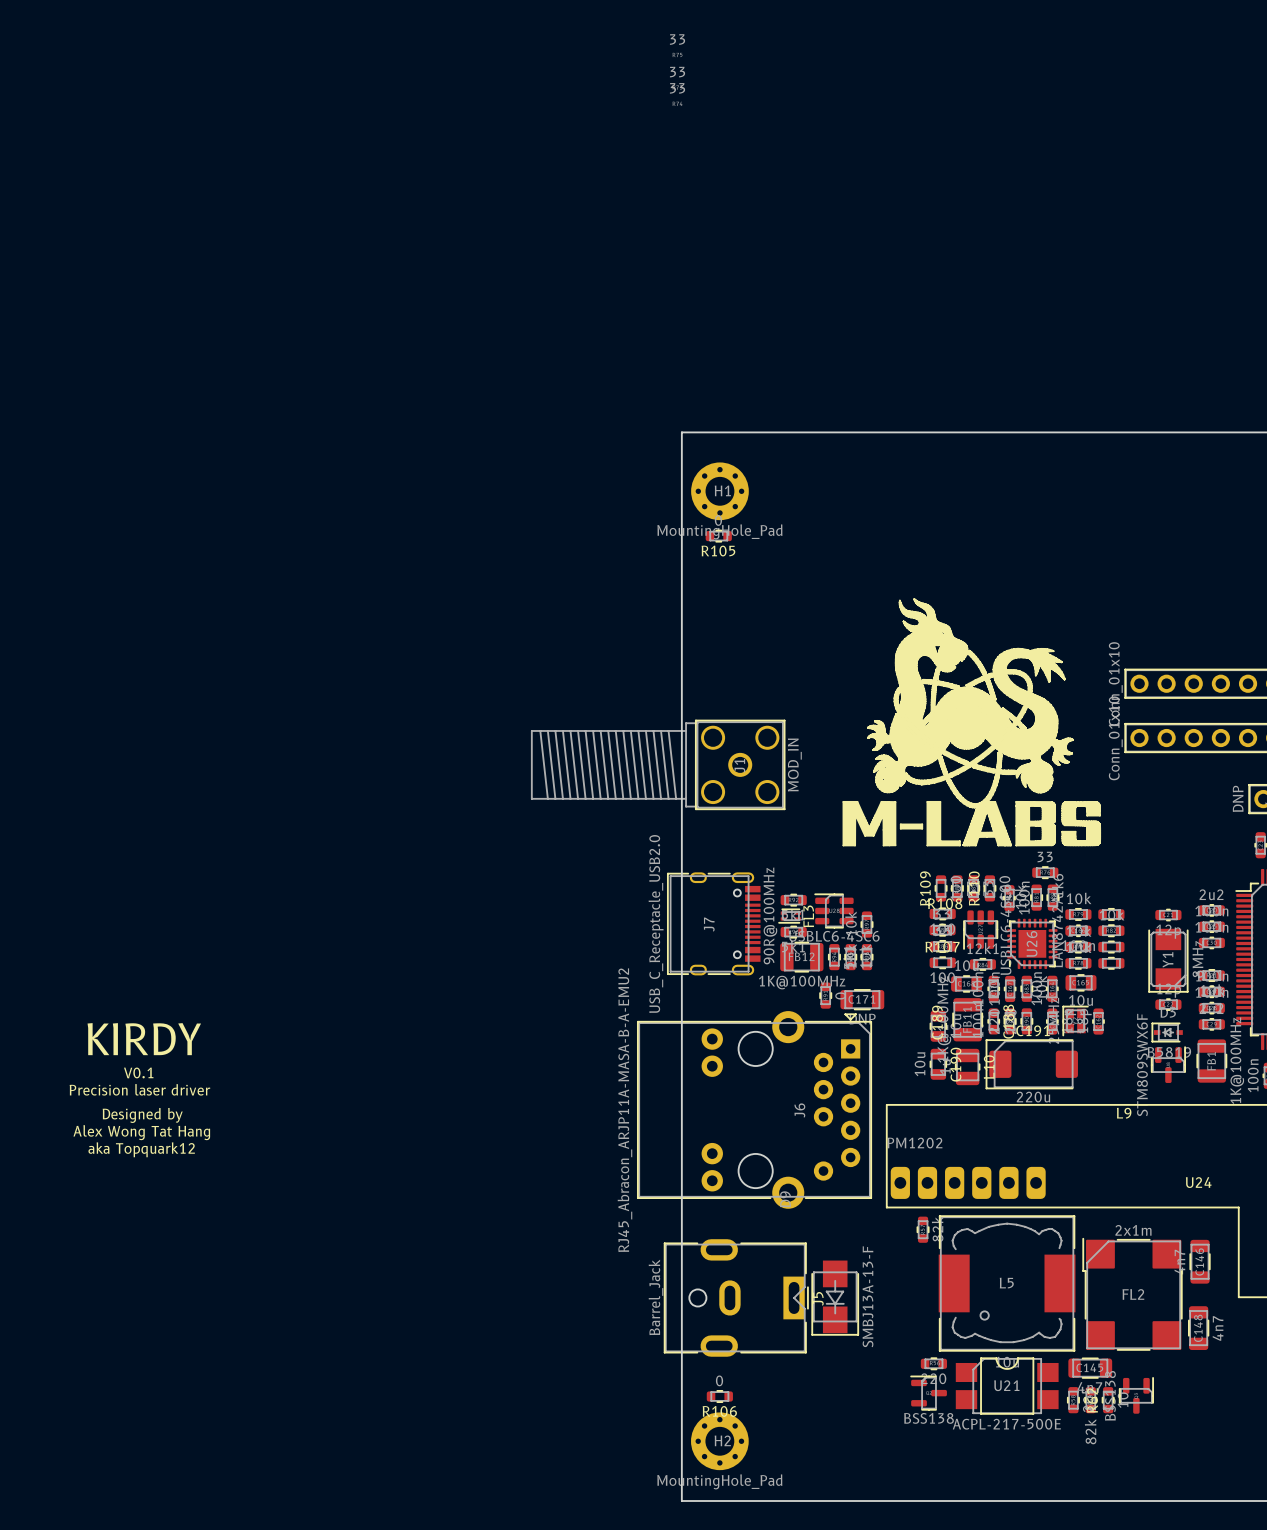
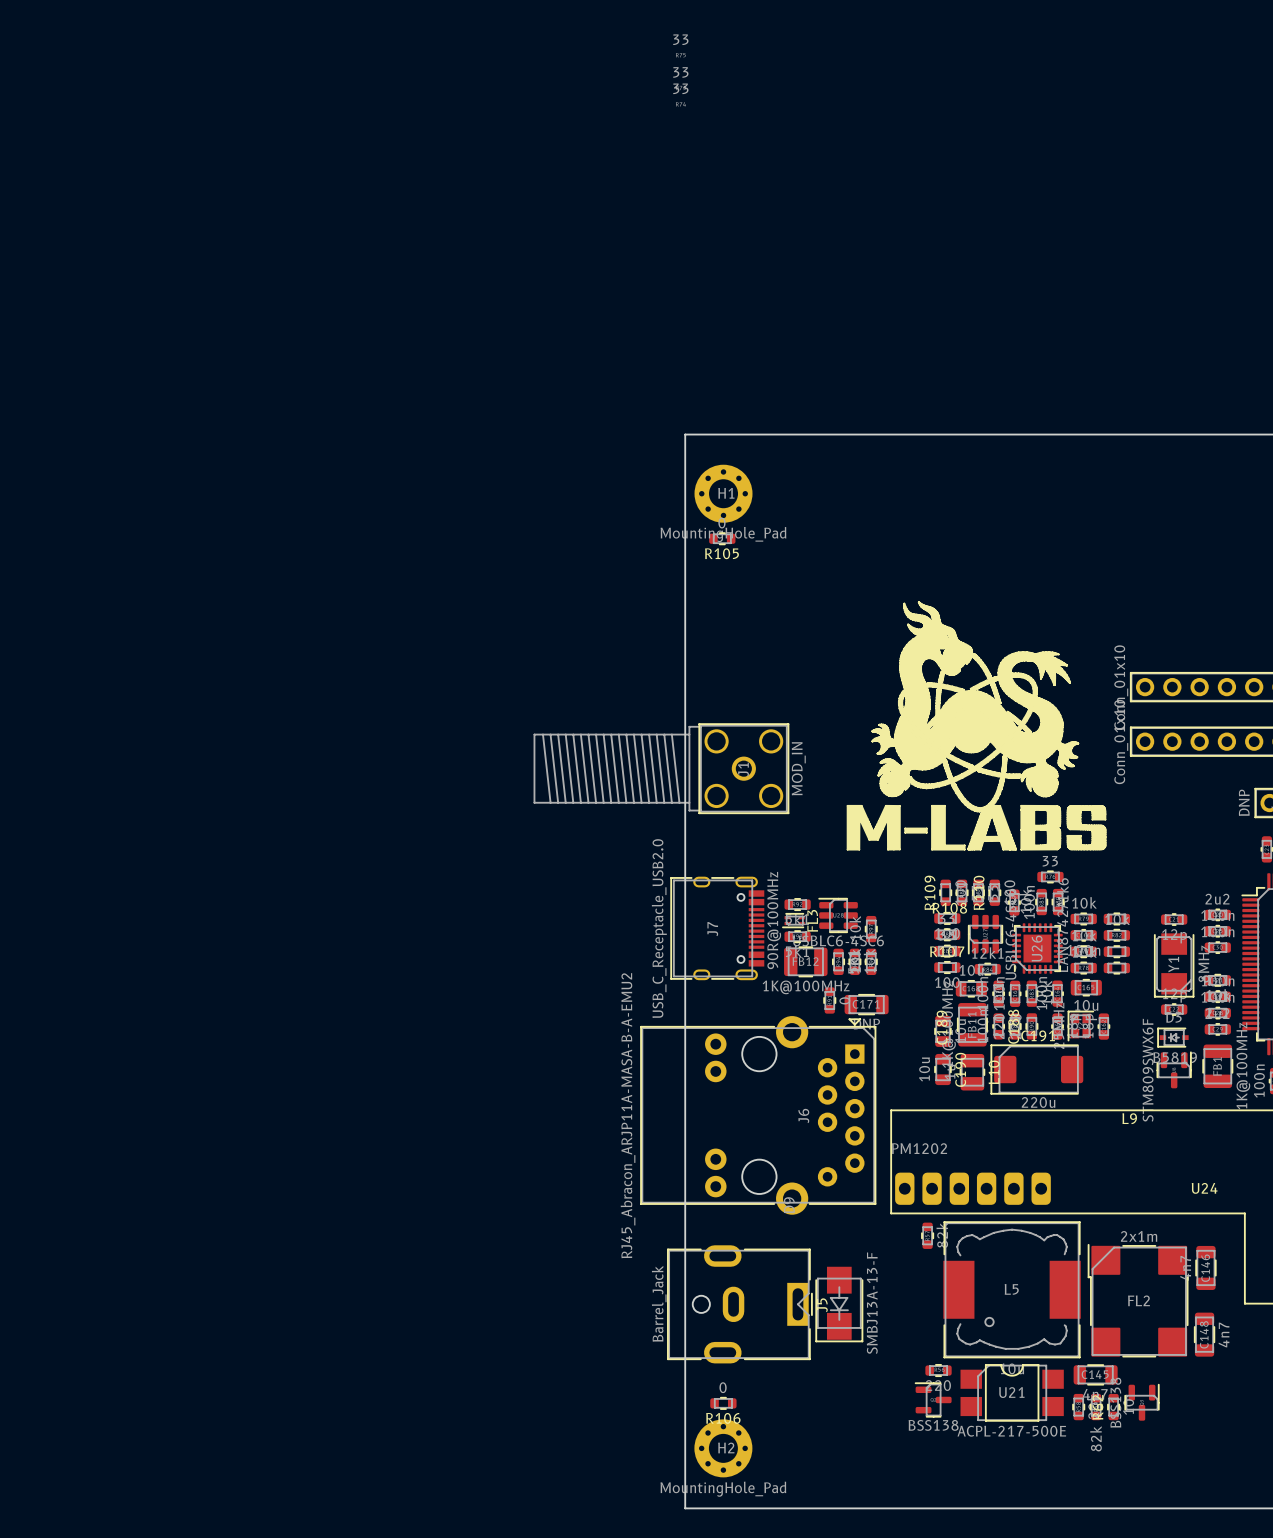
text: KIRDY (144, 1039) -> none
text: V0.1 (138, 1072) -> none
text: Precision laser driver (139, 1089) -> none
text: Designed by (142, 1115) -> none
text: Alex Wong Tat Hang (141, 1132) -> none
text: aka Topquark12 (141, 1149) -> none

